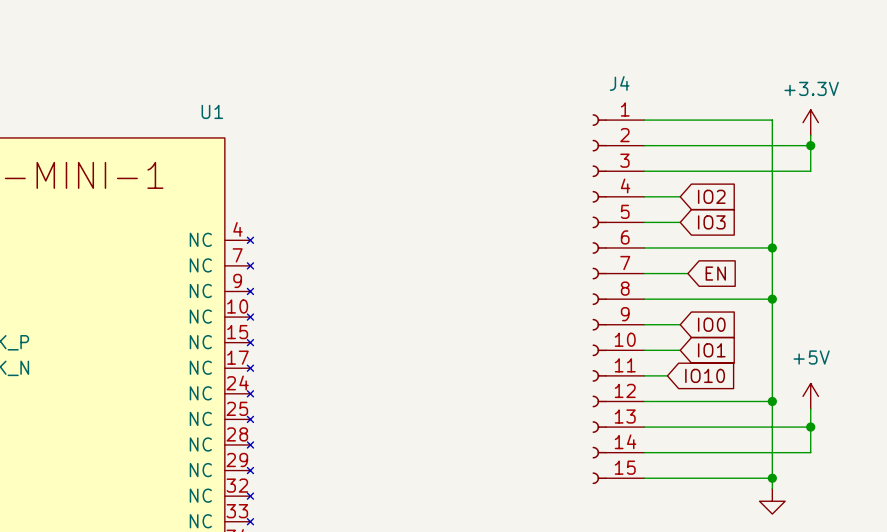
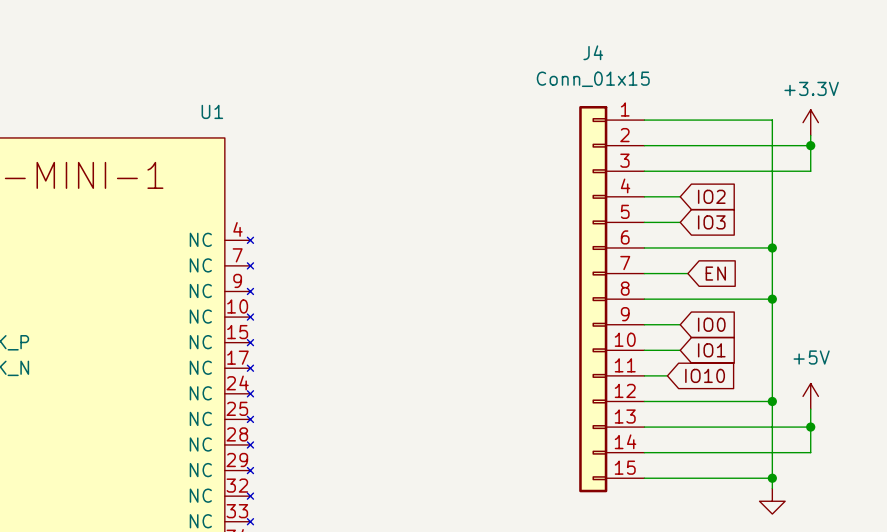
J4 value: none -> Conn_01x15 (593, 79)
J4 name position: J4 (619, 83) -> J4 (593, 52)
J4 symbol: [592, 114, 645, 485] -> [579, 106, 645, 493]

